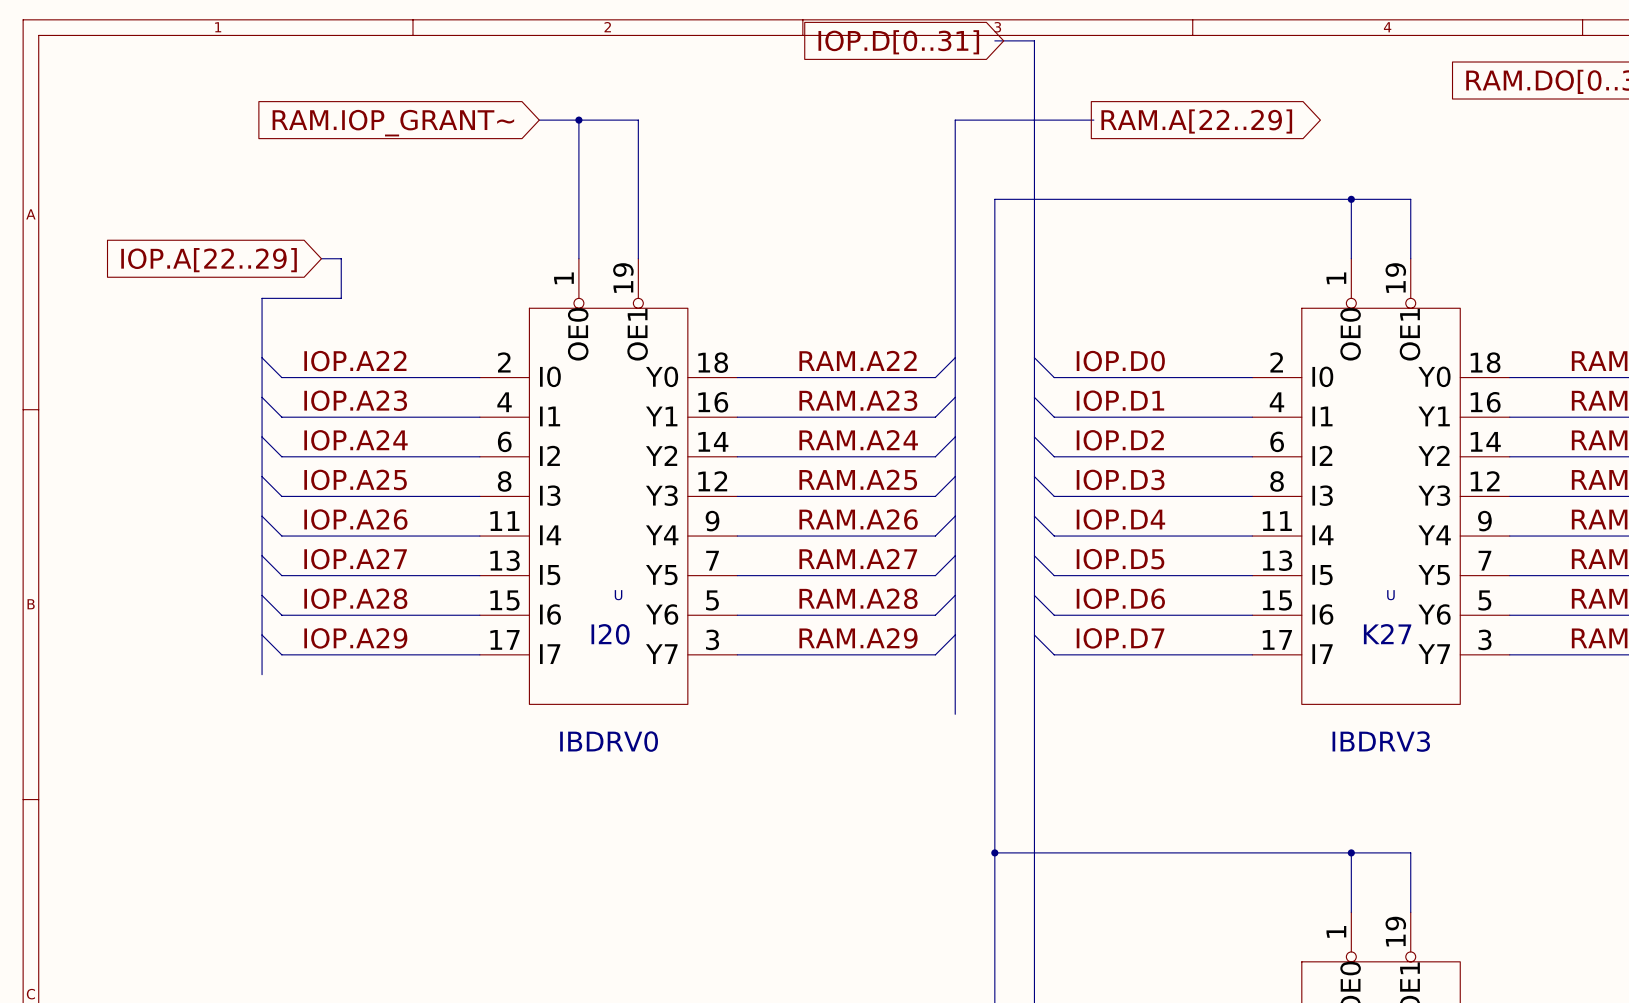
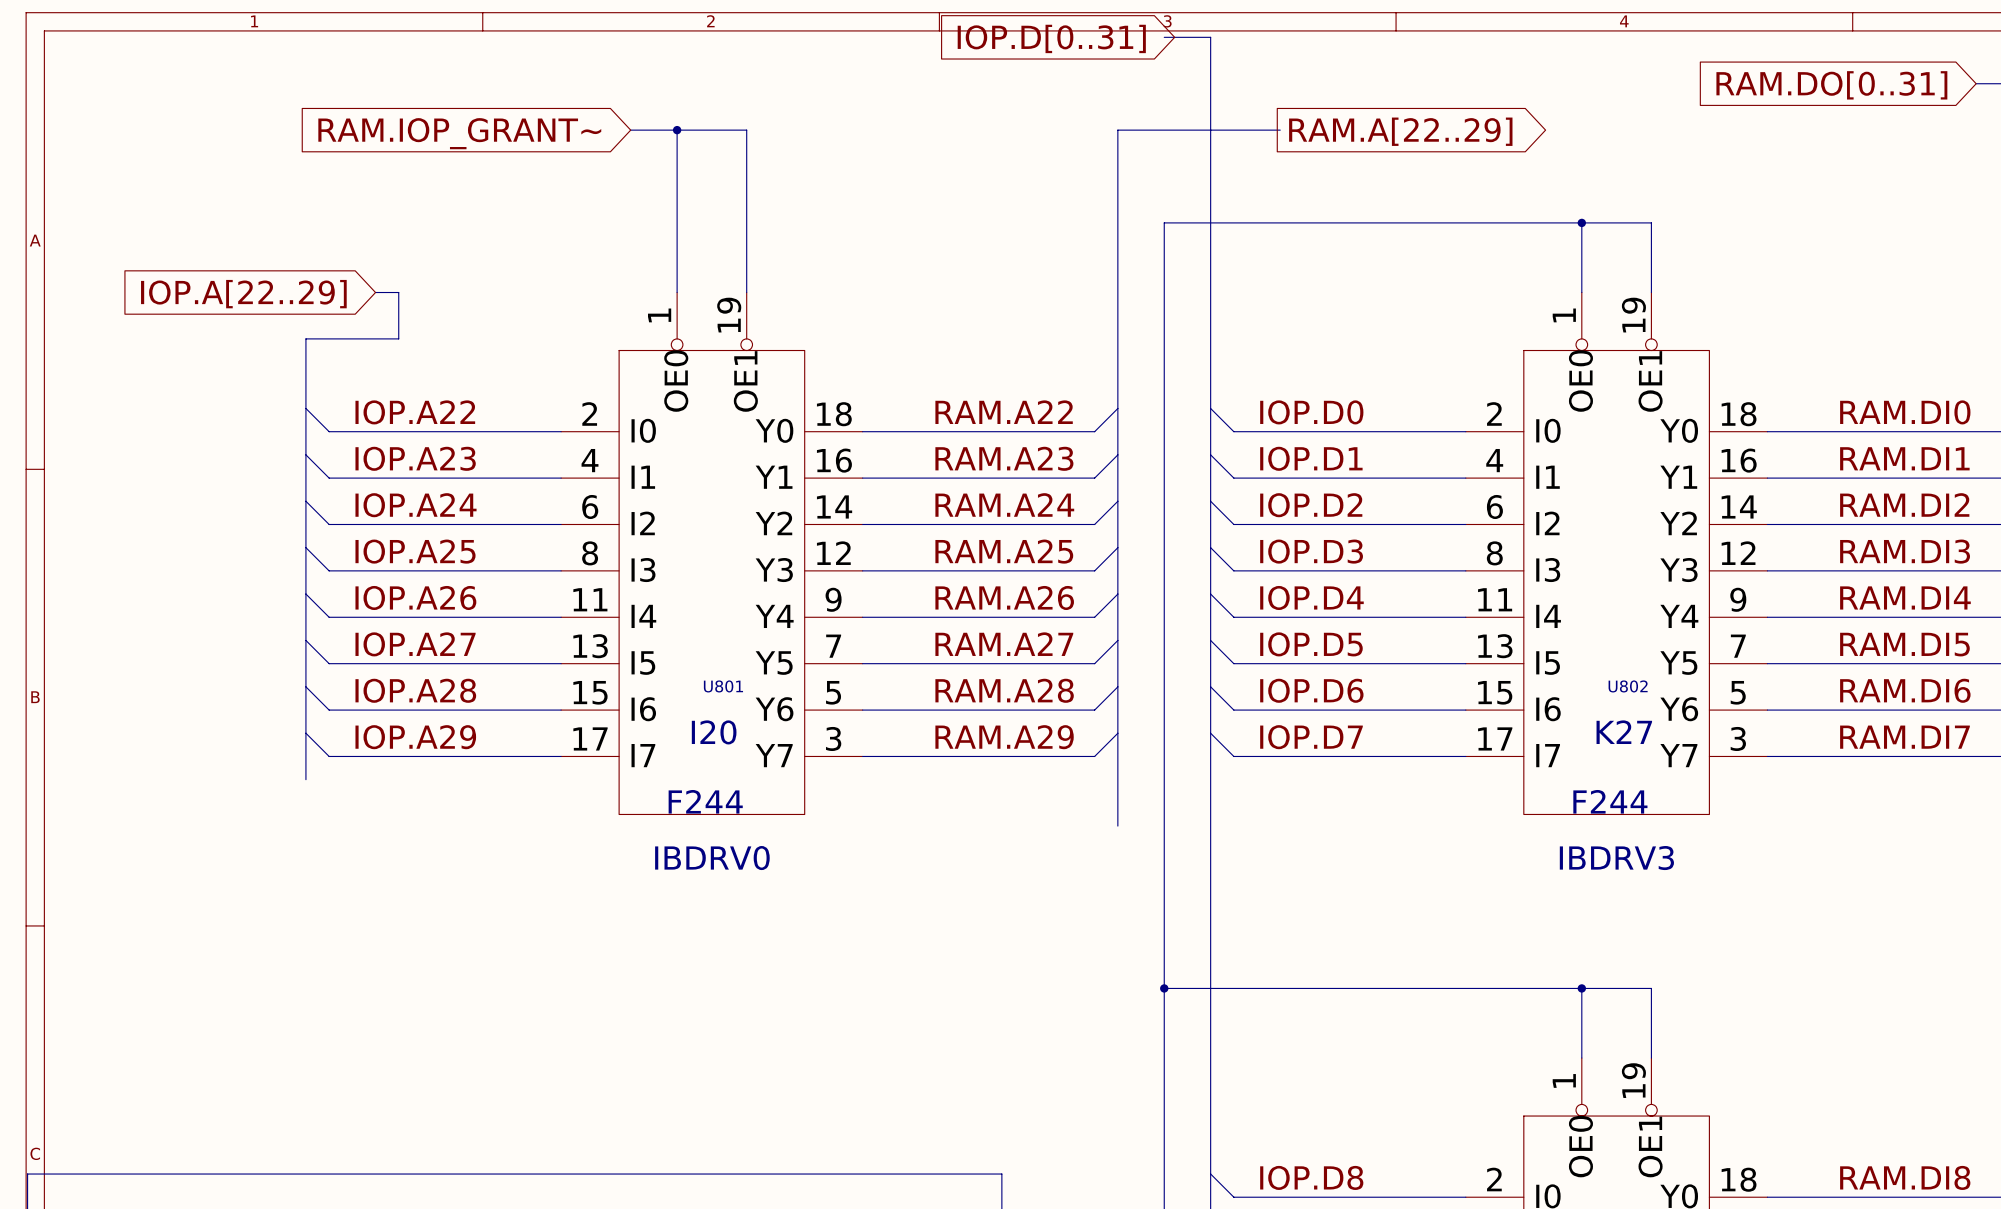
U name: U (618, 595) -> U801 (723, 686)
U name: U (1390, 595) -> U802 (1628, 686)
U value: none -> F244 (705, 801)
U value: none -> F244 (1610, 801)

